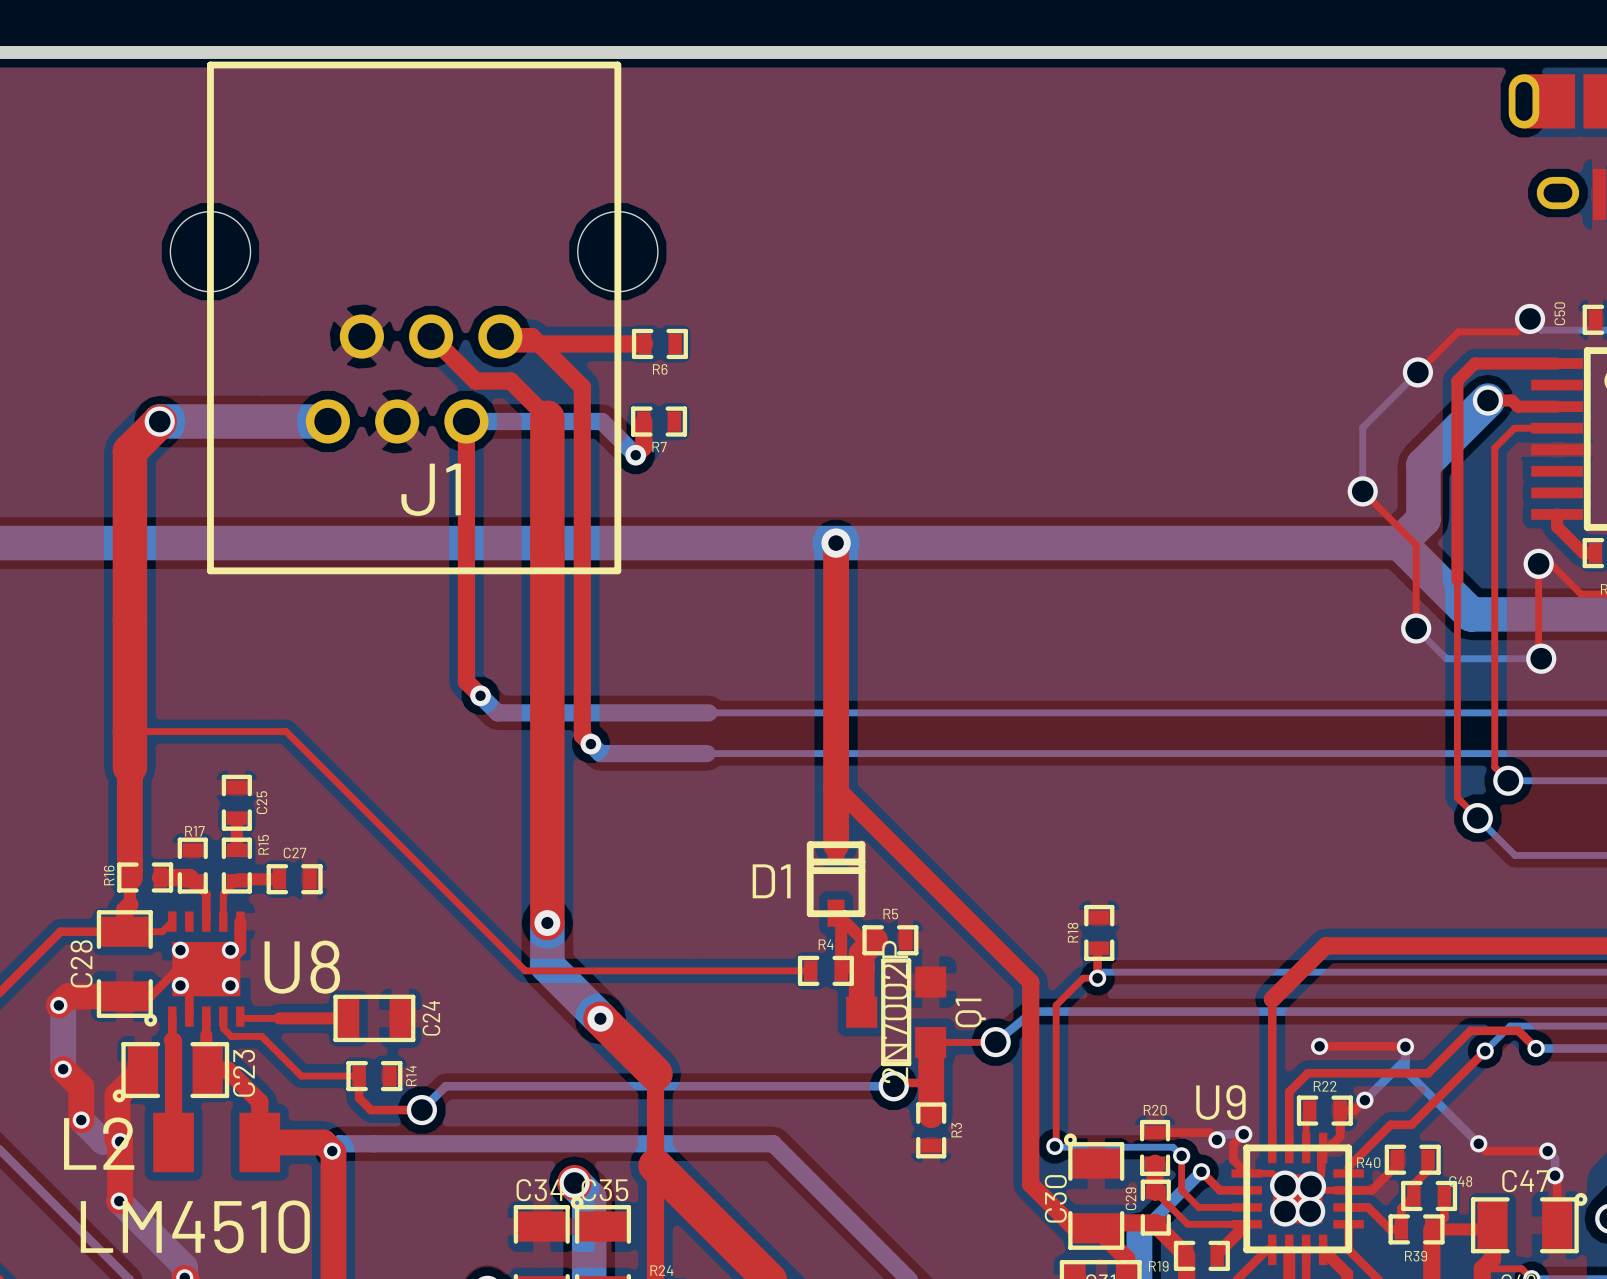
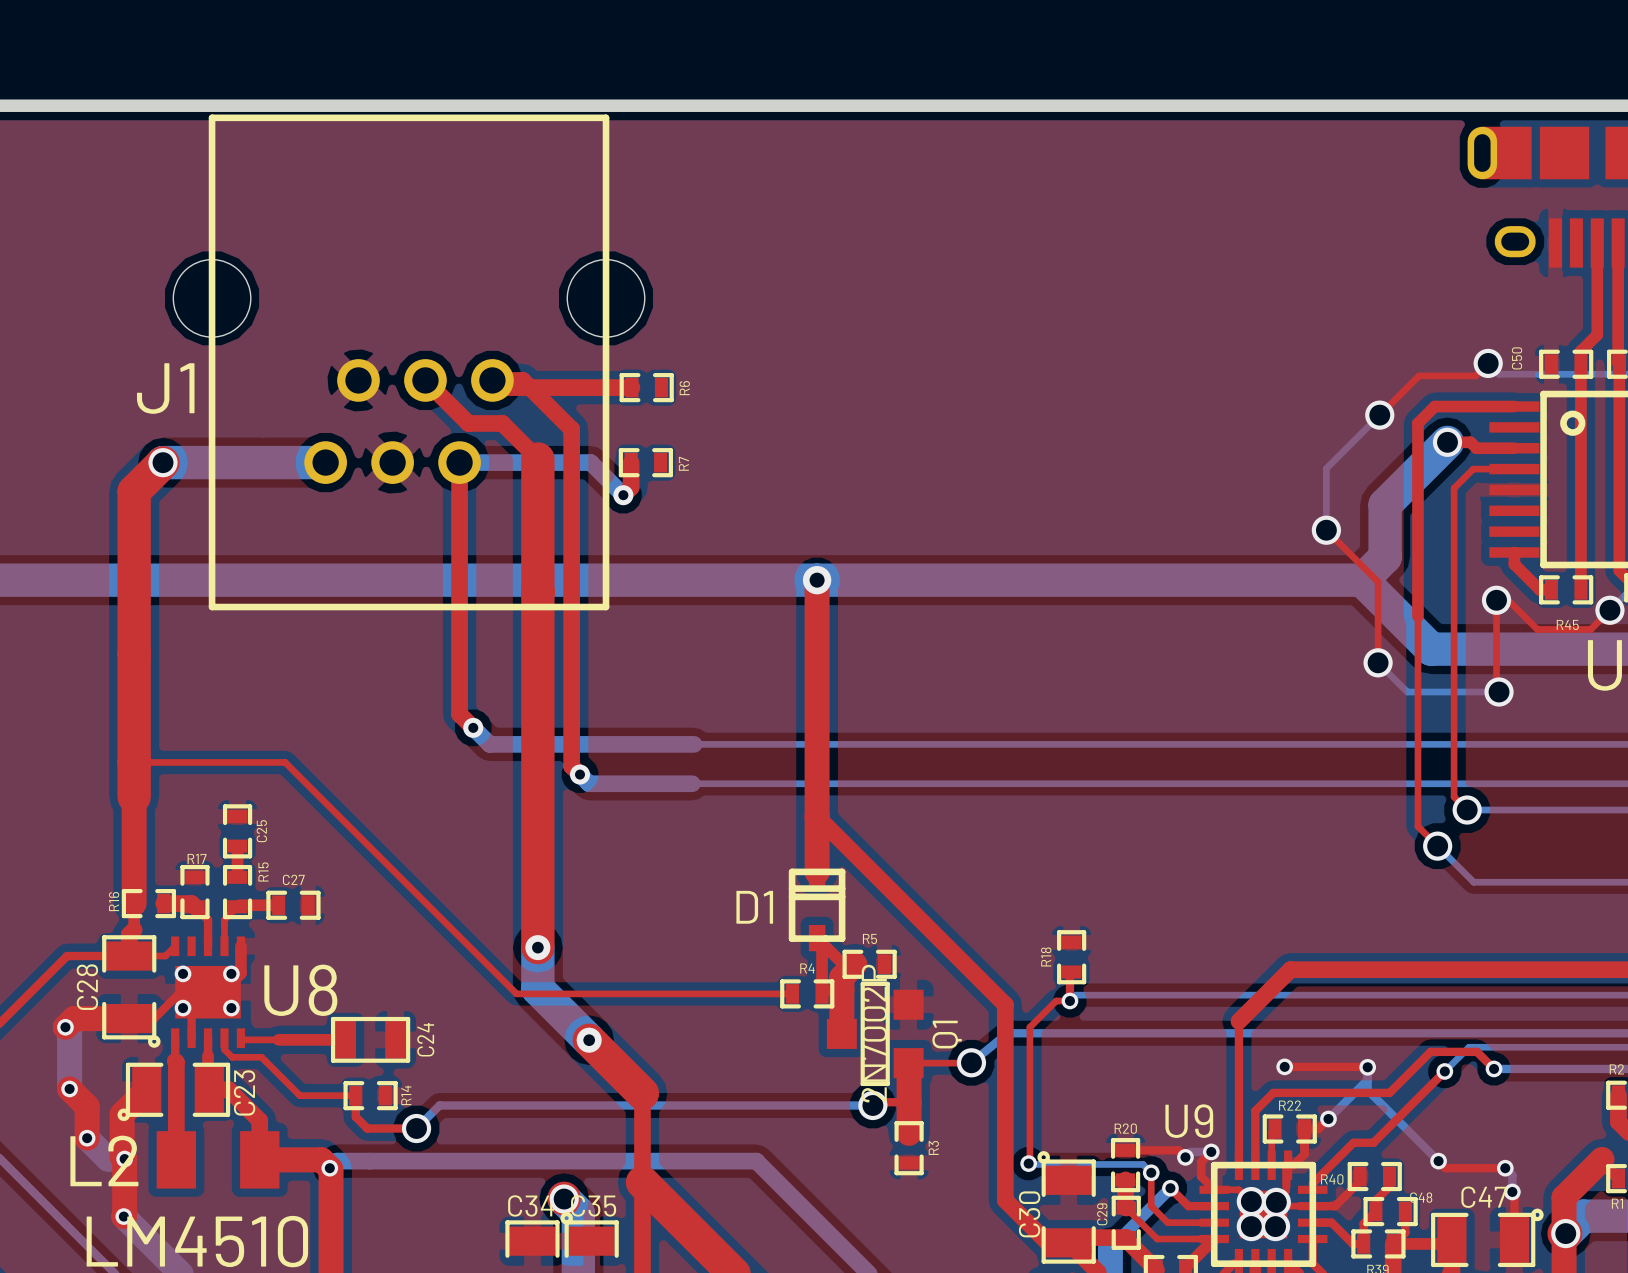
R6 name rotation: 0° (660, 369) -> 90° counterclockwise (684, 388)
R6 name position: R6 (660, 369) -> R6 (684, 388)
R7 name rotation: 0° (659, 447) -> 90° counterclockwise (683, 463)
R7 name position: R7 (659, 447) -> R7 (683, 463)
J1 name position: J1 (431, 489) -> J1 (165, 388)

